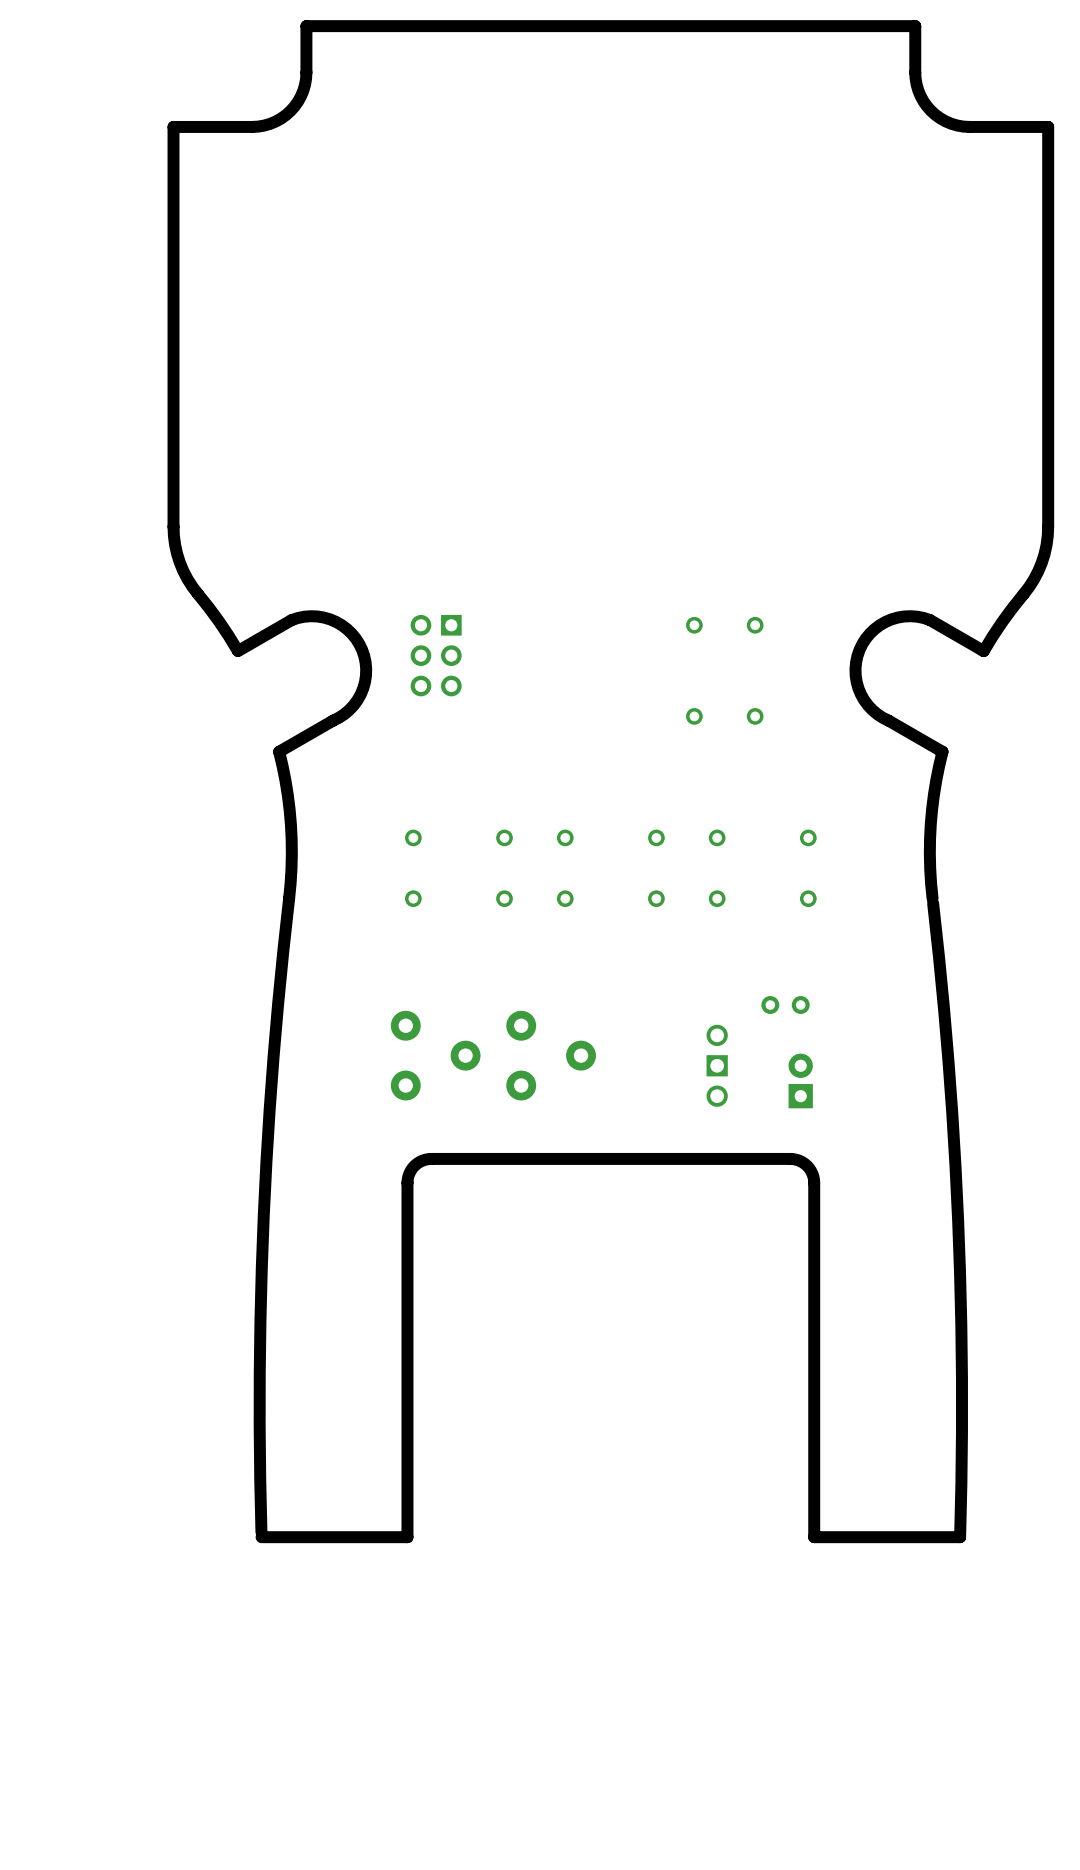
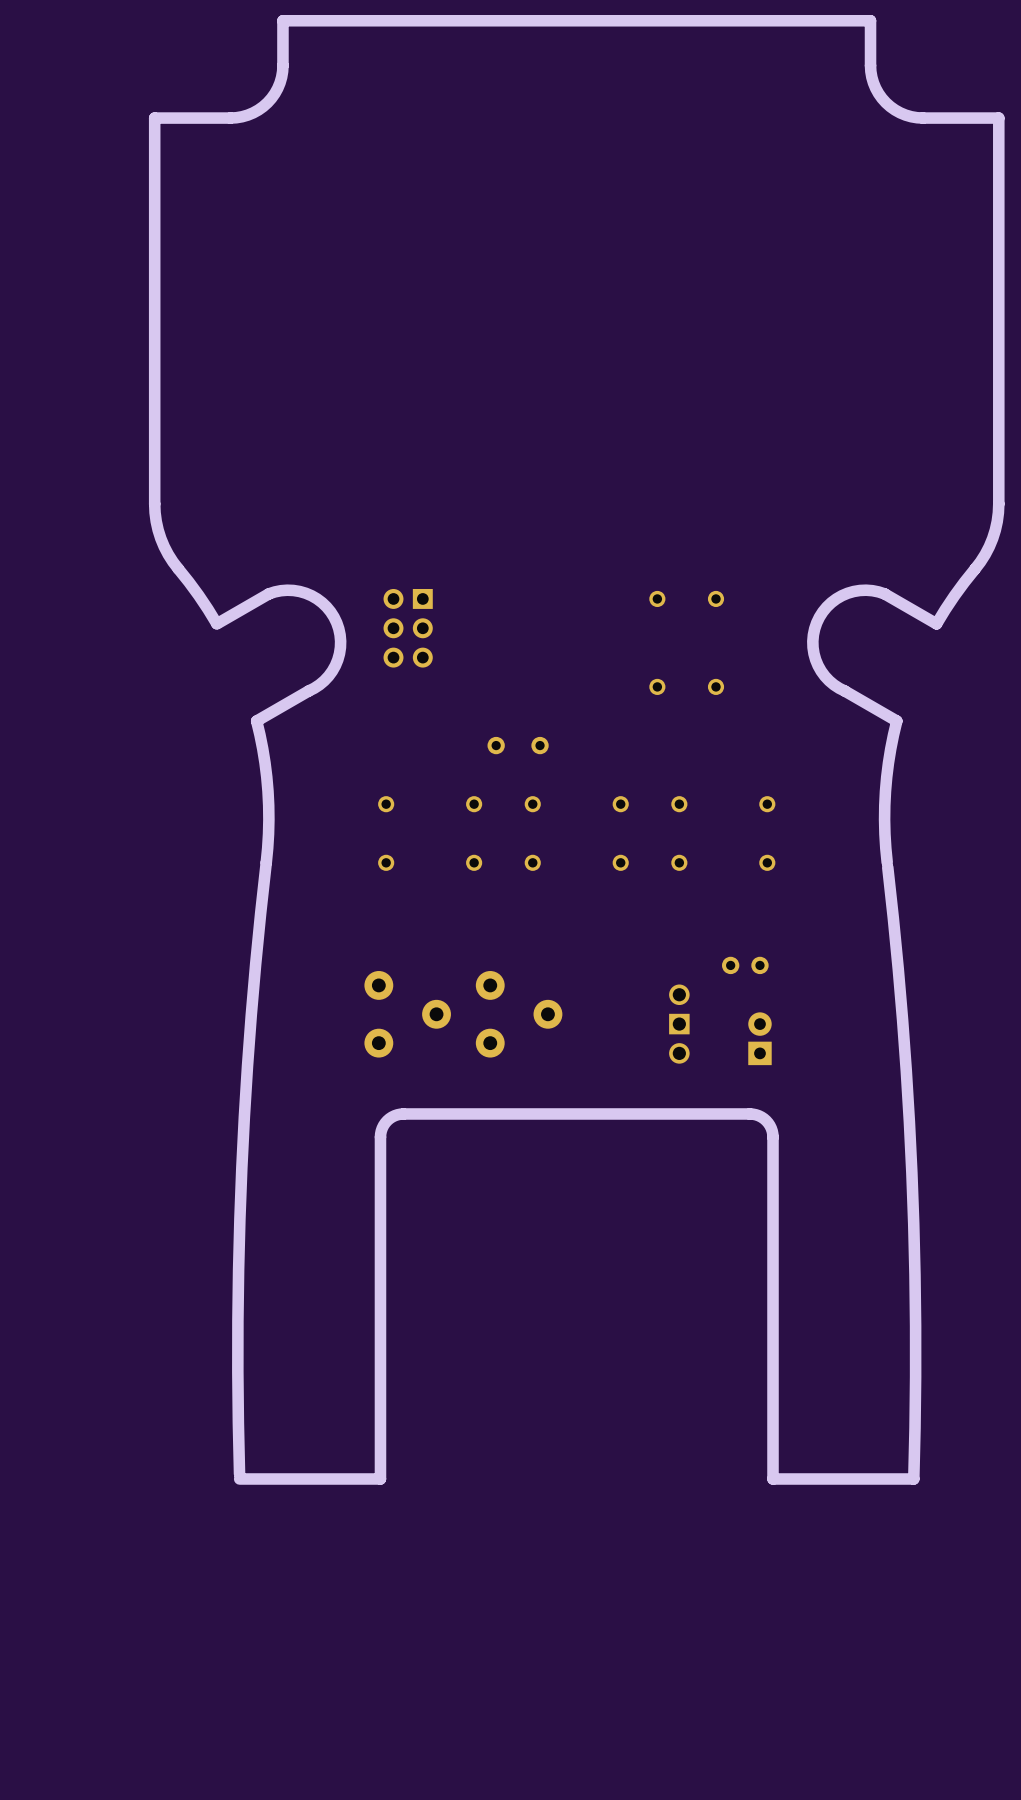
part: none -> (518, 745)

